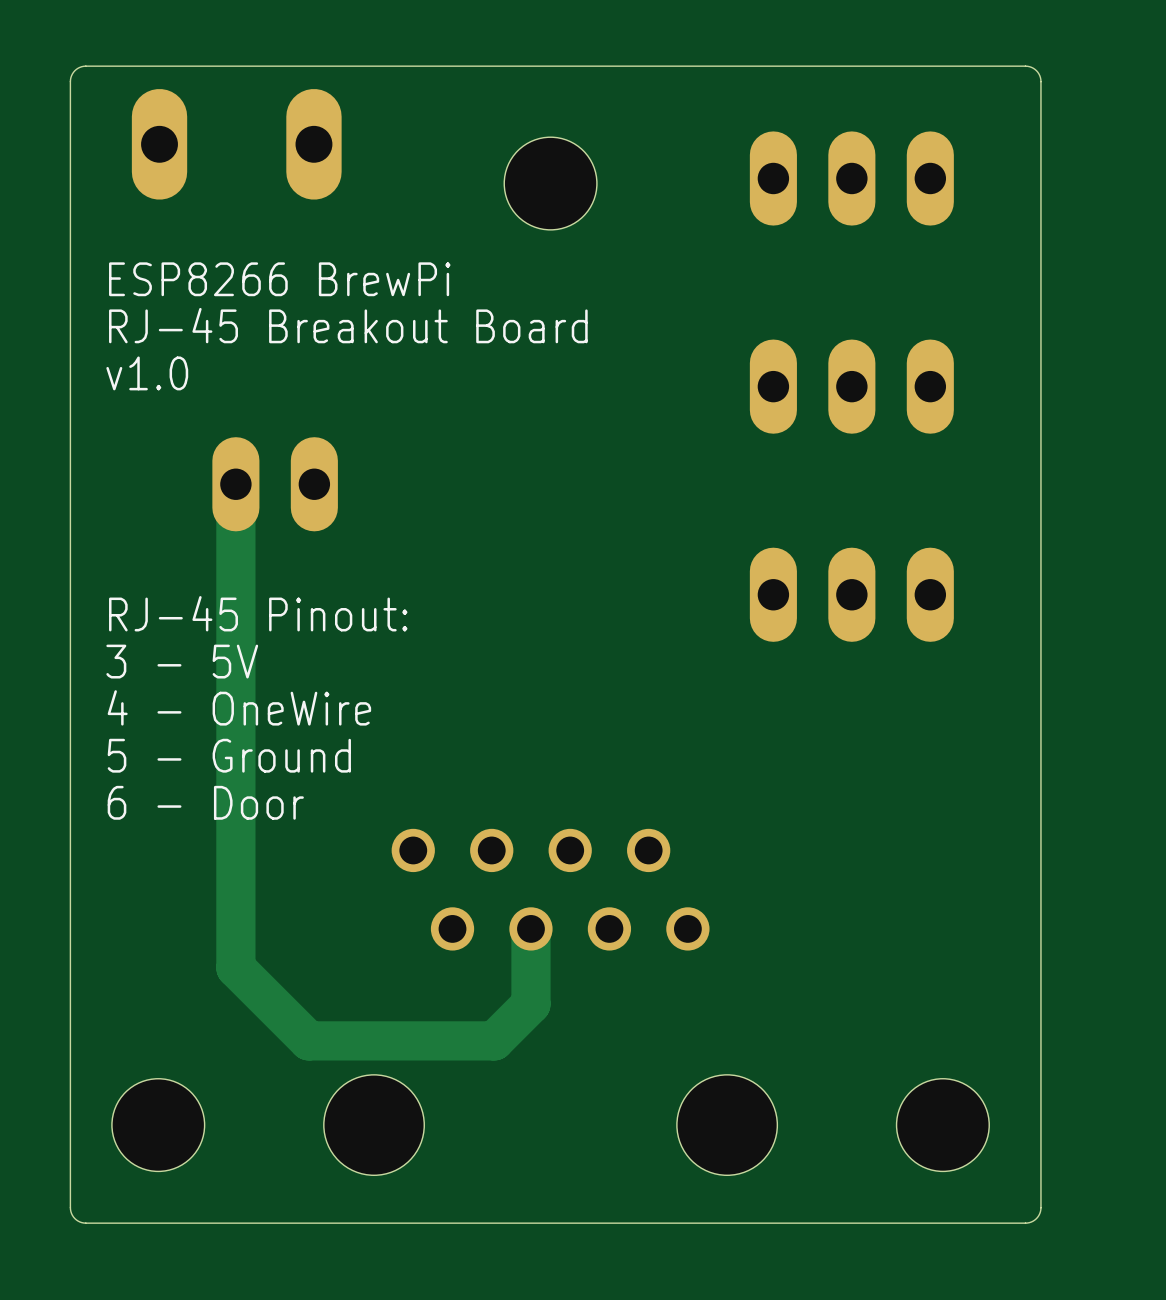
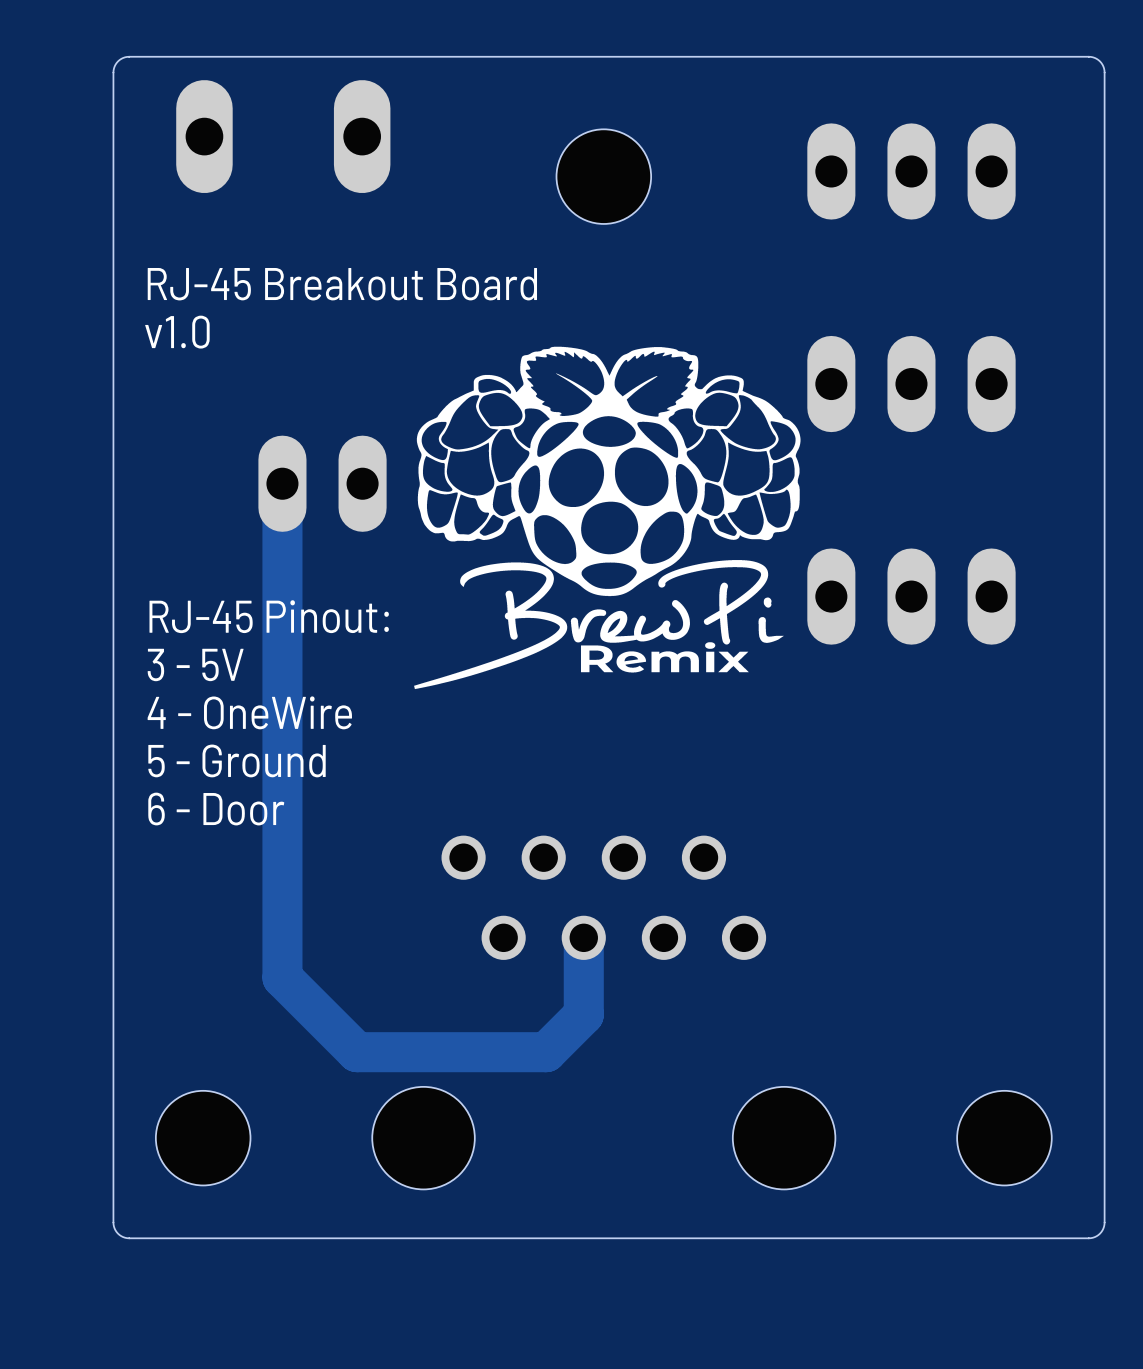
text: ESP8266 BrewPi (279, 279) -> none
text position: RJ-45 Breakout Board (348, 325) -> RJ-45 Breakout Board (342, 284)
drawing: none -> [414, 346, 801, 690]
text position: v1.0 (147, 373) -> v1.0 (177, 332)

